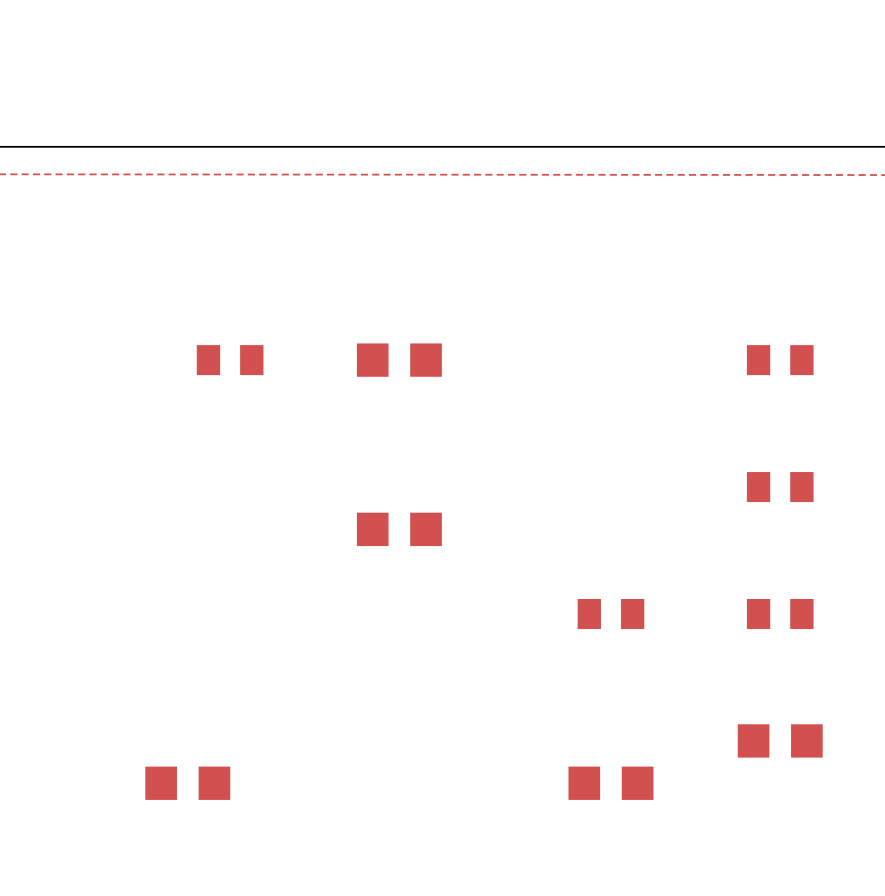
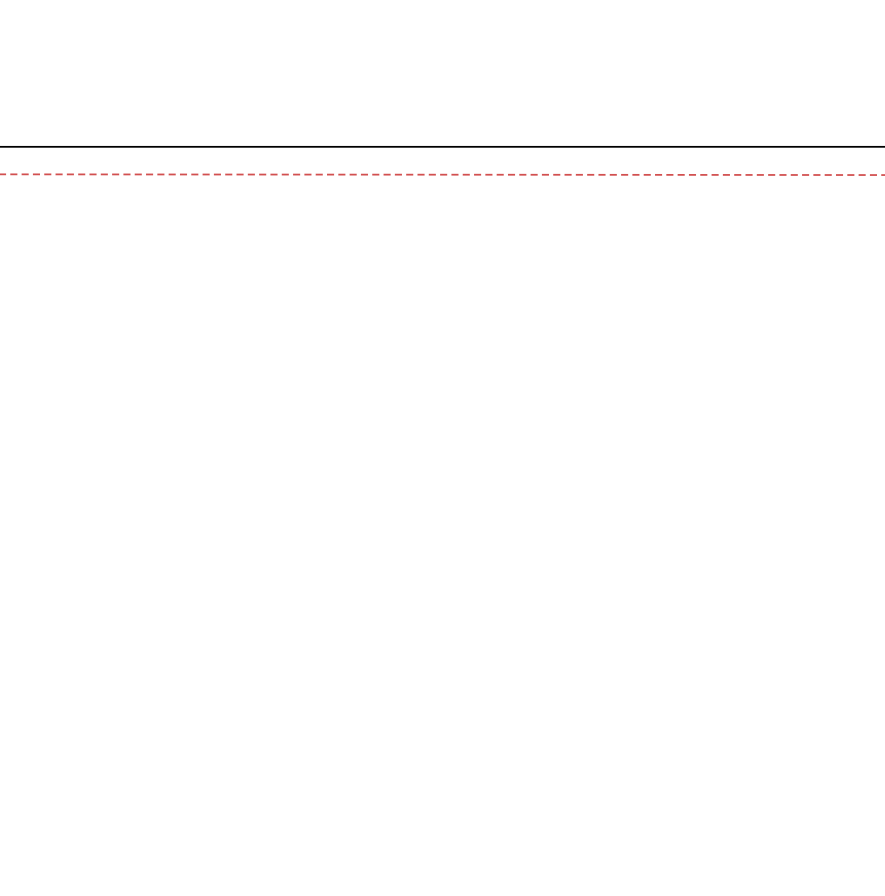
part: (230, 360) -> none
part: (399, 360) -> none
part: (780, 360) -> none
part: (780, 487) -> none
part: (399, 529) -> none
part: (610, 613) -> none
part: (780, 613) -> none
part: (780, 740) -> none
part: (187, 783) -> none
part: (610, 783) -> none

